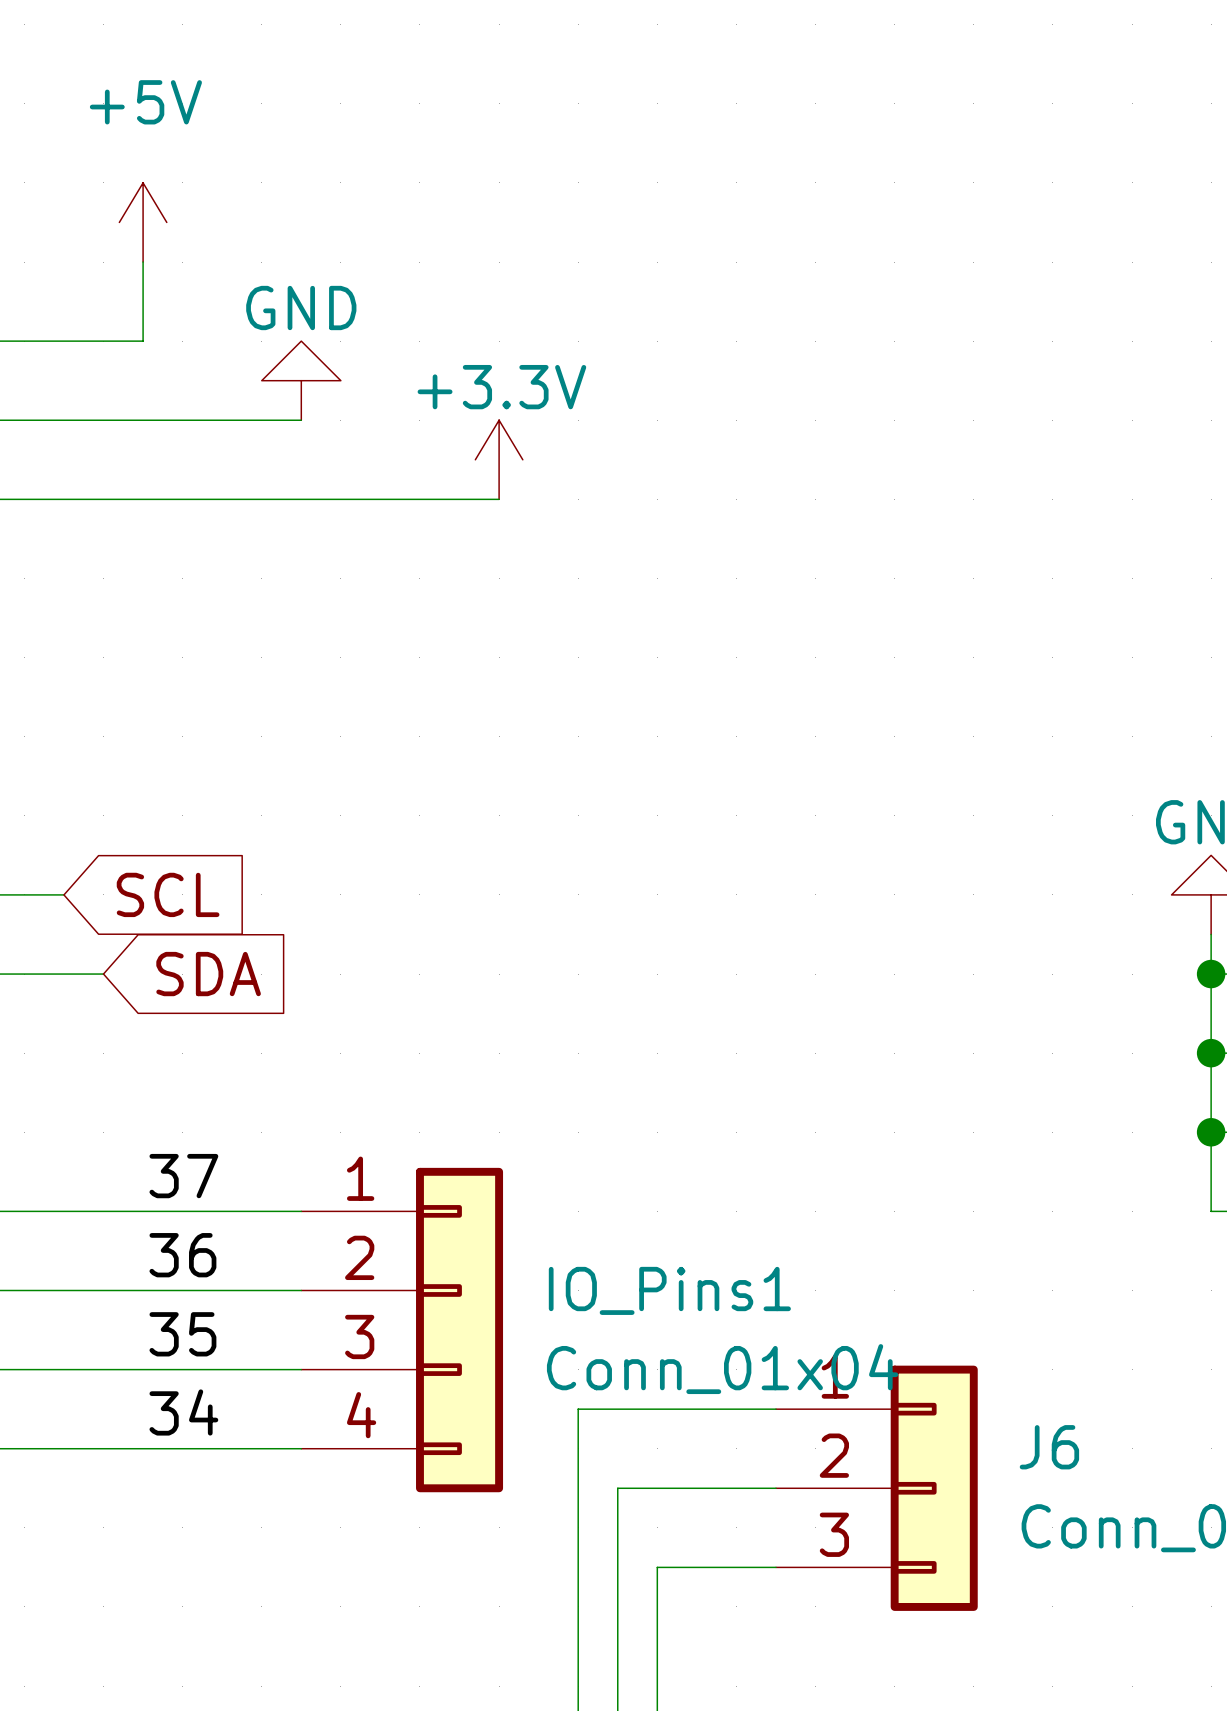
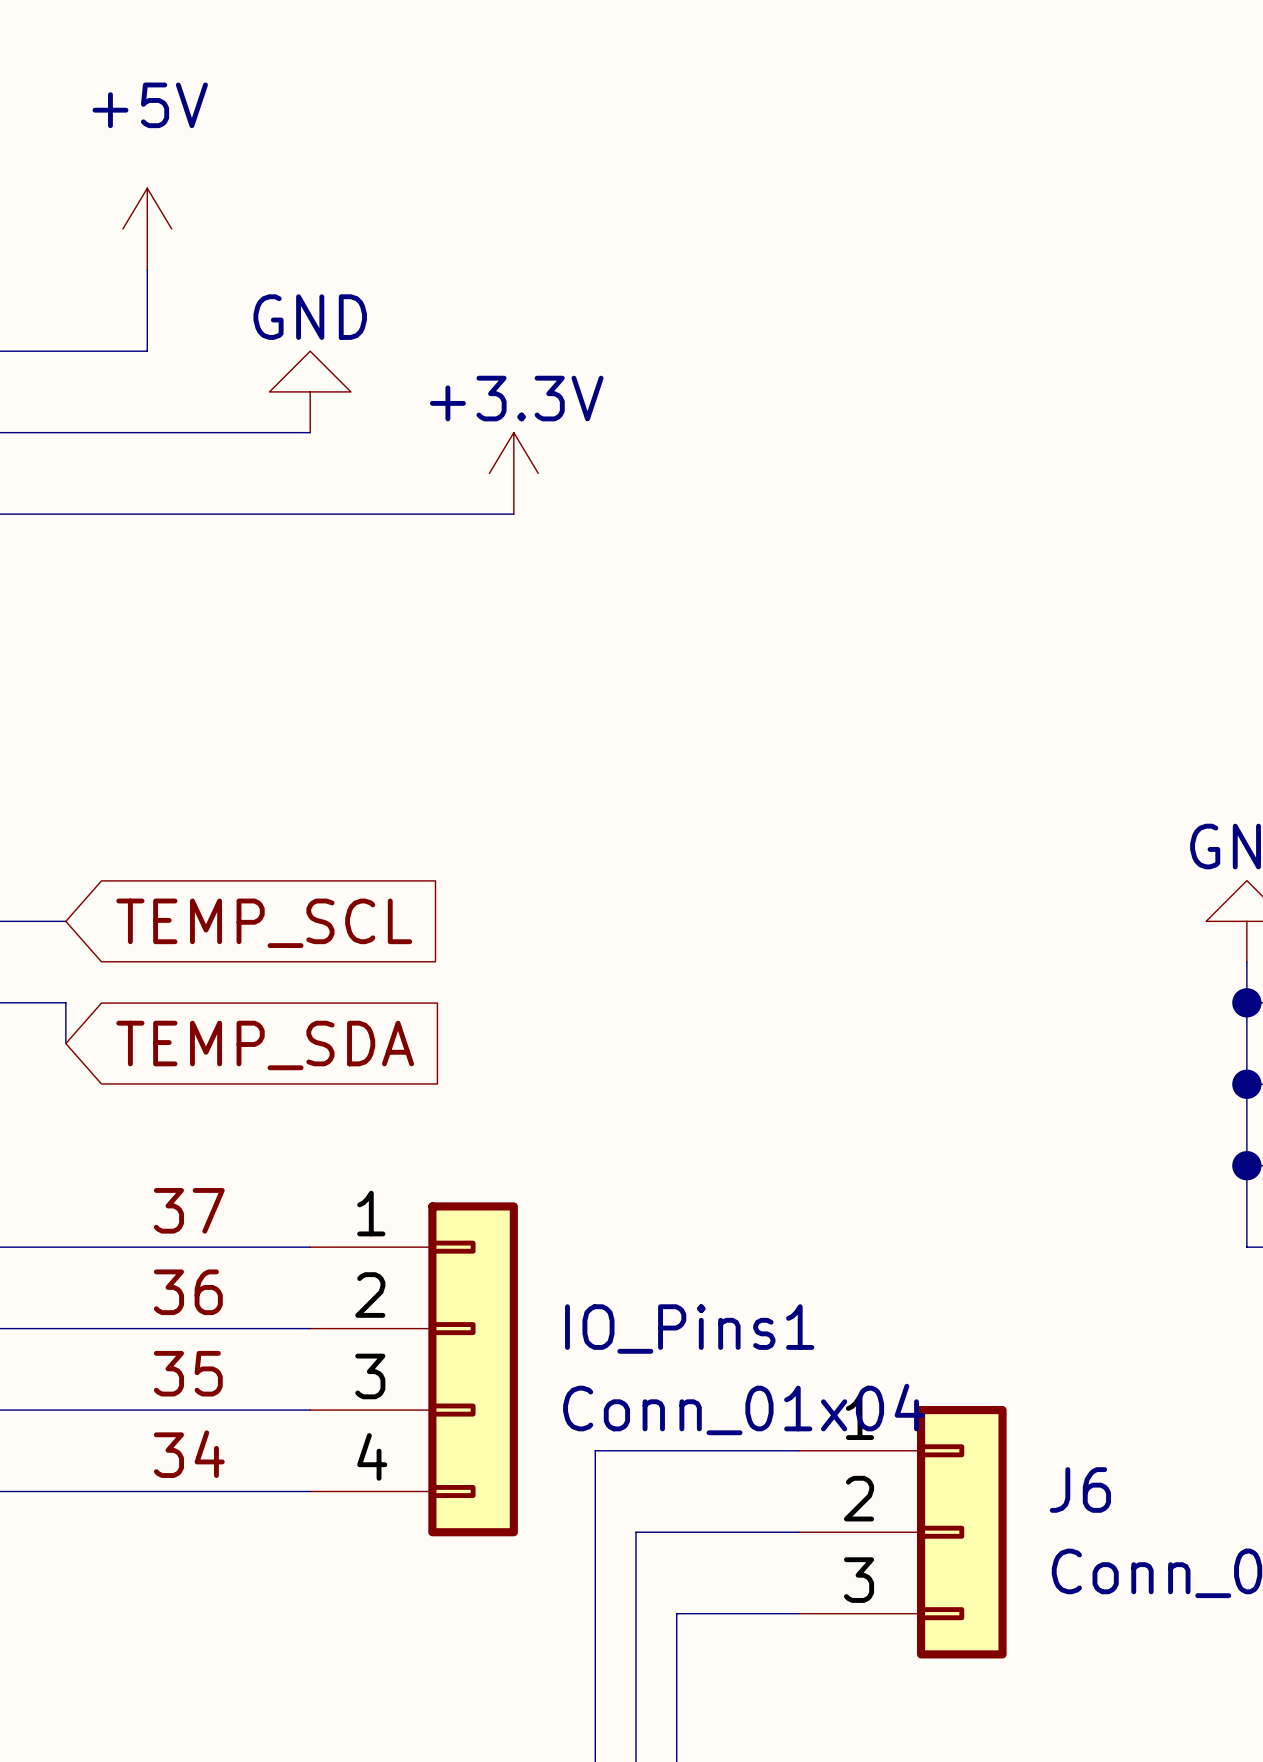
global label: SCL (168, 894) -> TEMP_SCL (264, 923)
wire: (63, 974) (103, 974) -> (65, 1002) (65, 1043)
global label: SDA (208, 974) -> none
global label: none -> TEMP_SDA (265, 1045)

